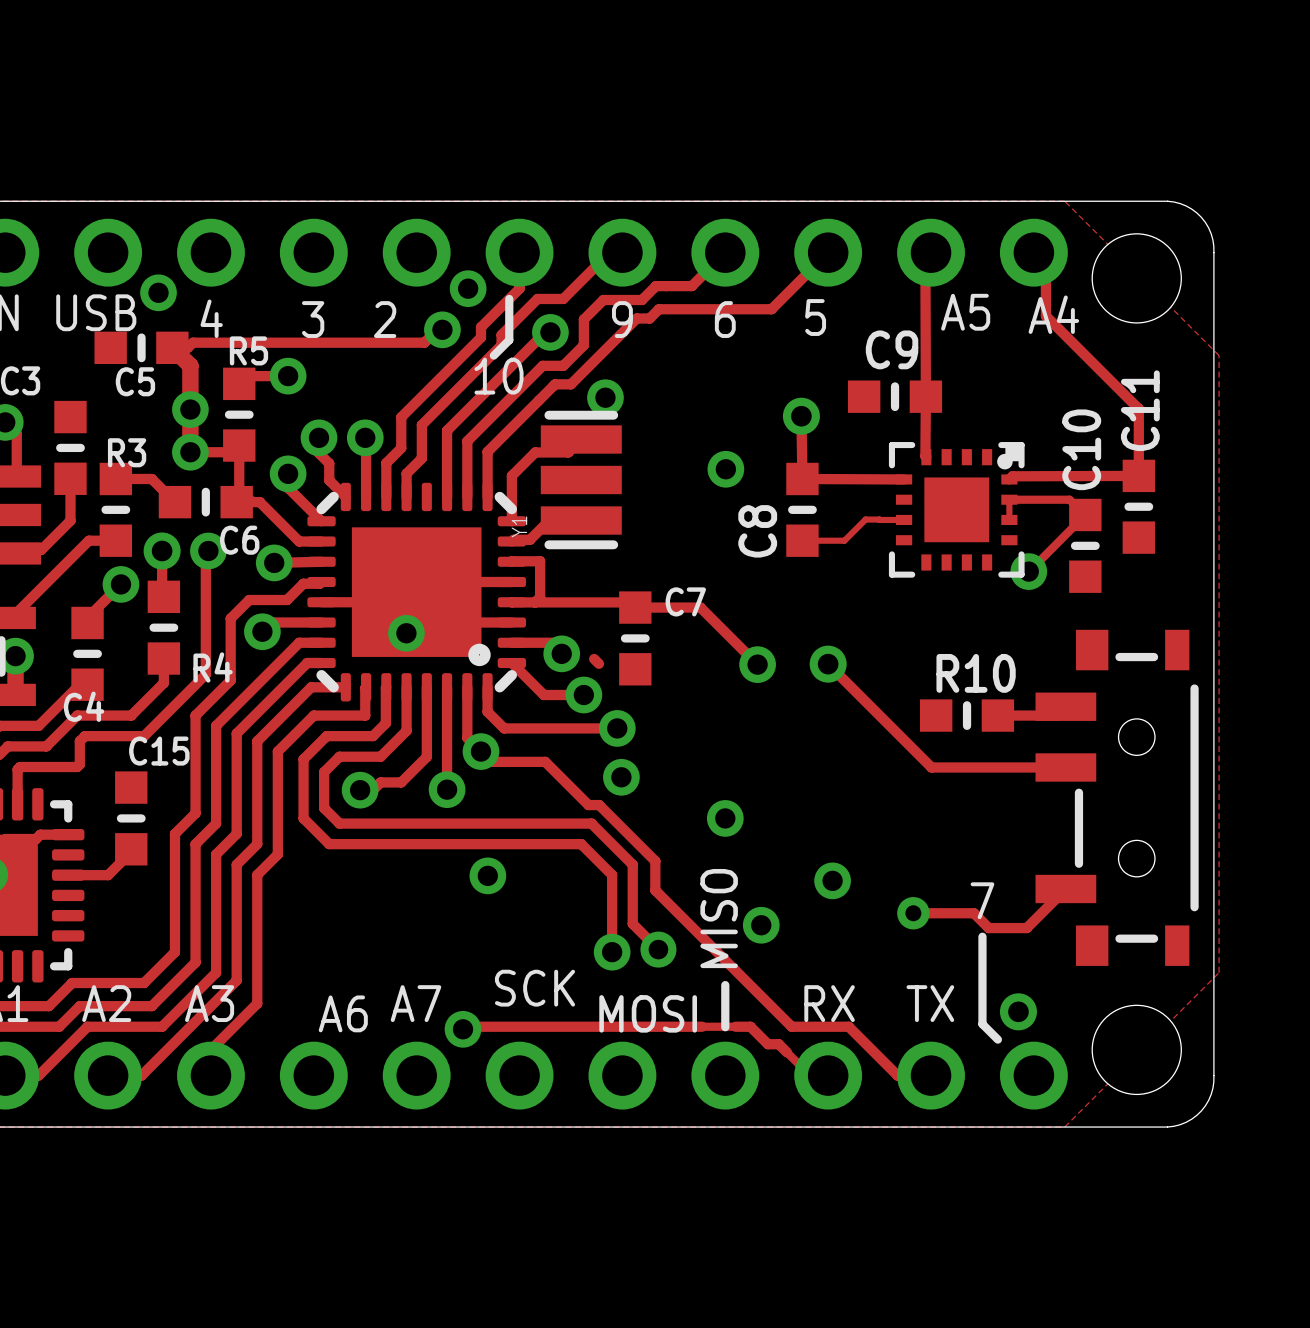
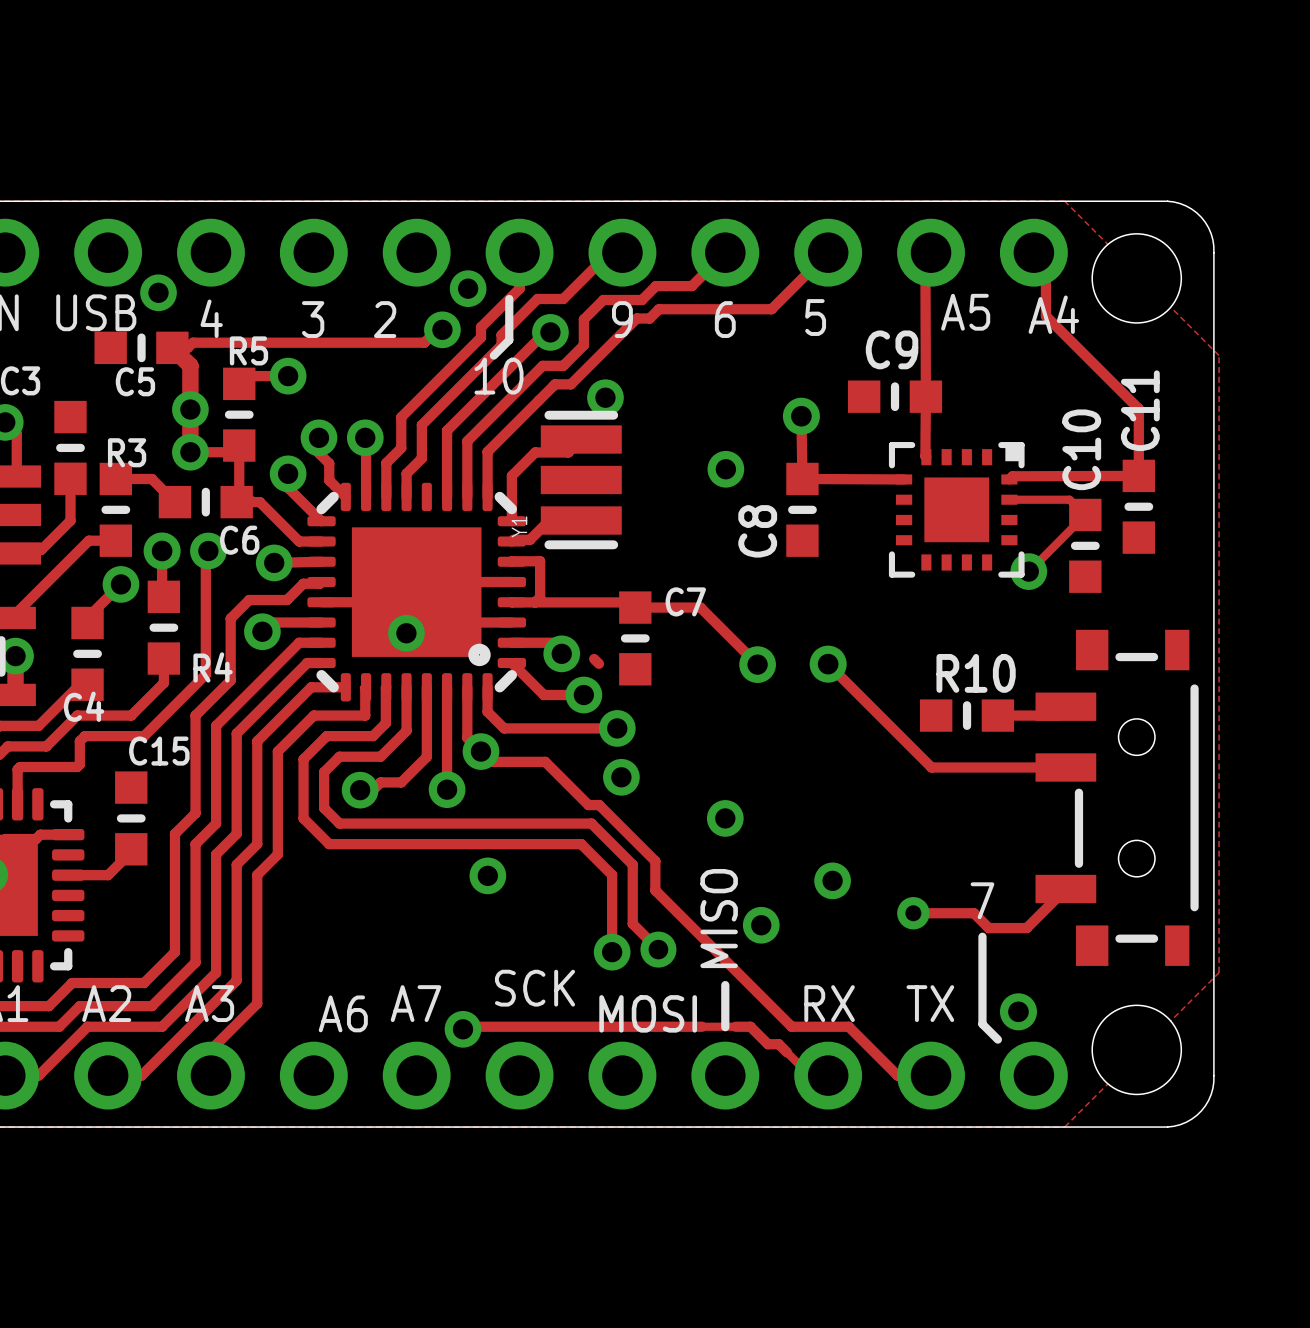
drawing: [997, 453, 1013, 470] -> none
track: (1009, 499) (1009, 519) -> none
track: (879, 519) (865, 519) (844, 540) (802, 540) -> none
track: (879, 519) (904, 519) -> none

